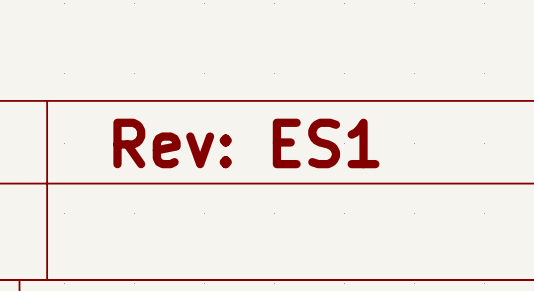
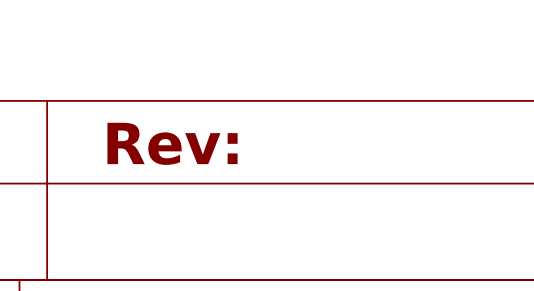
title block: Rev: ES1 (246, 143) -> Rev: (172, 143)

